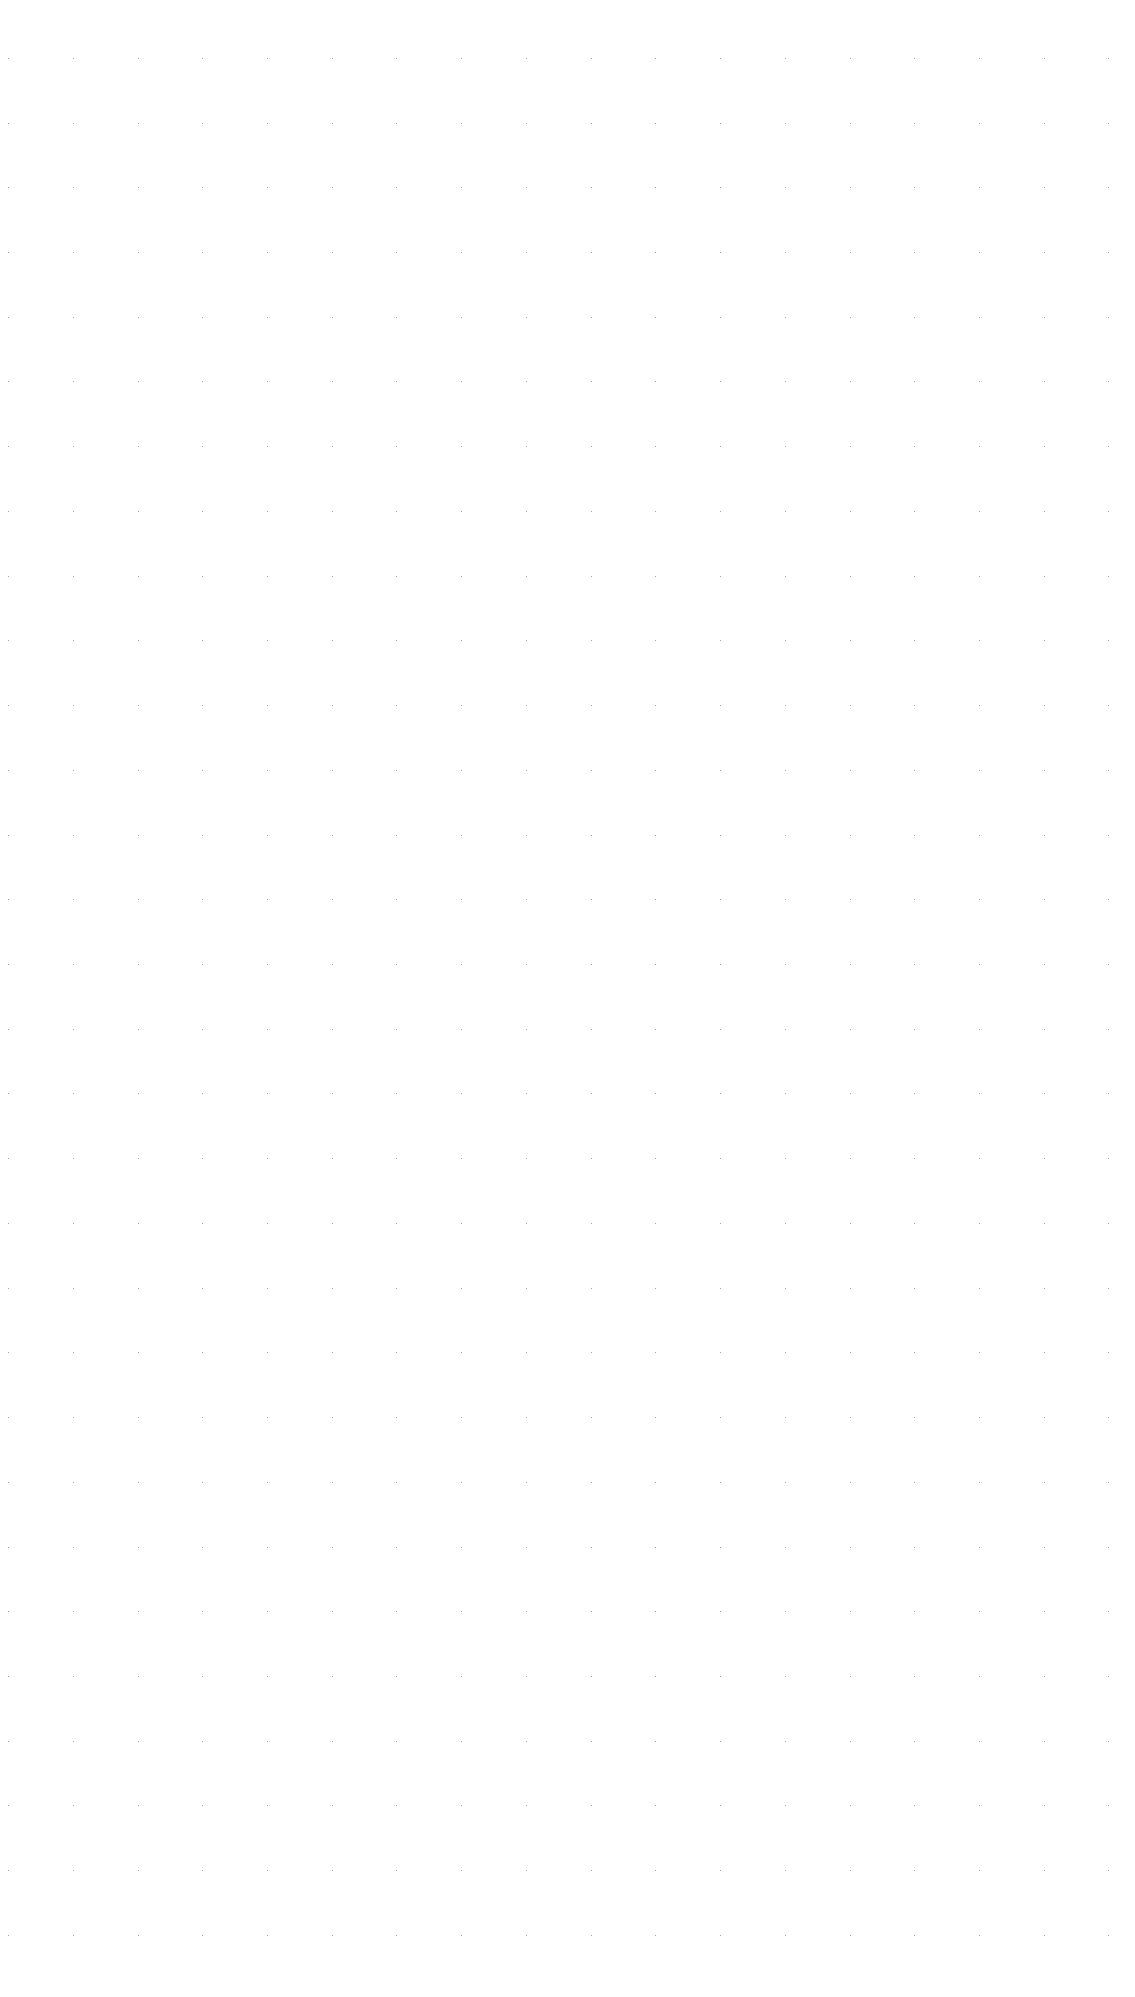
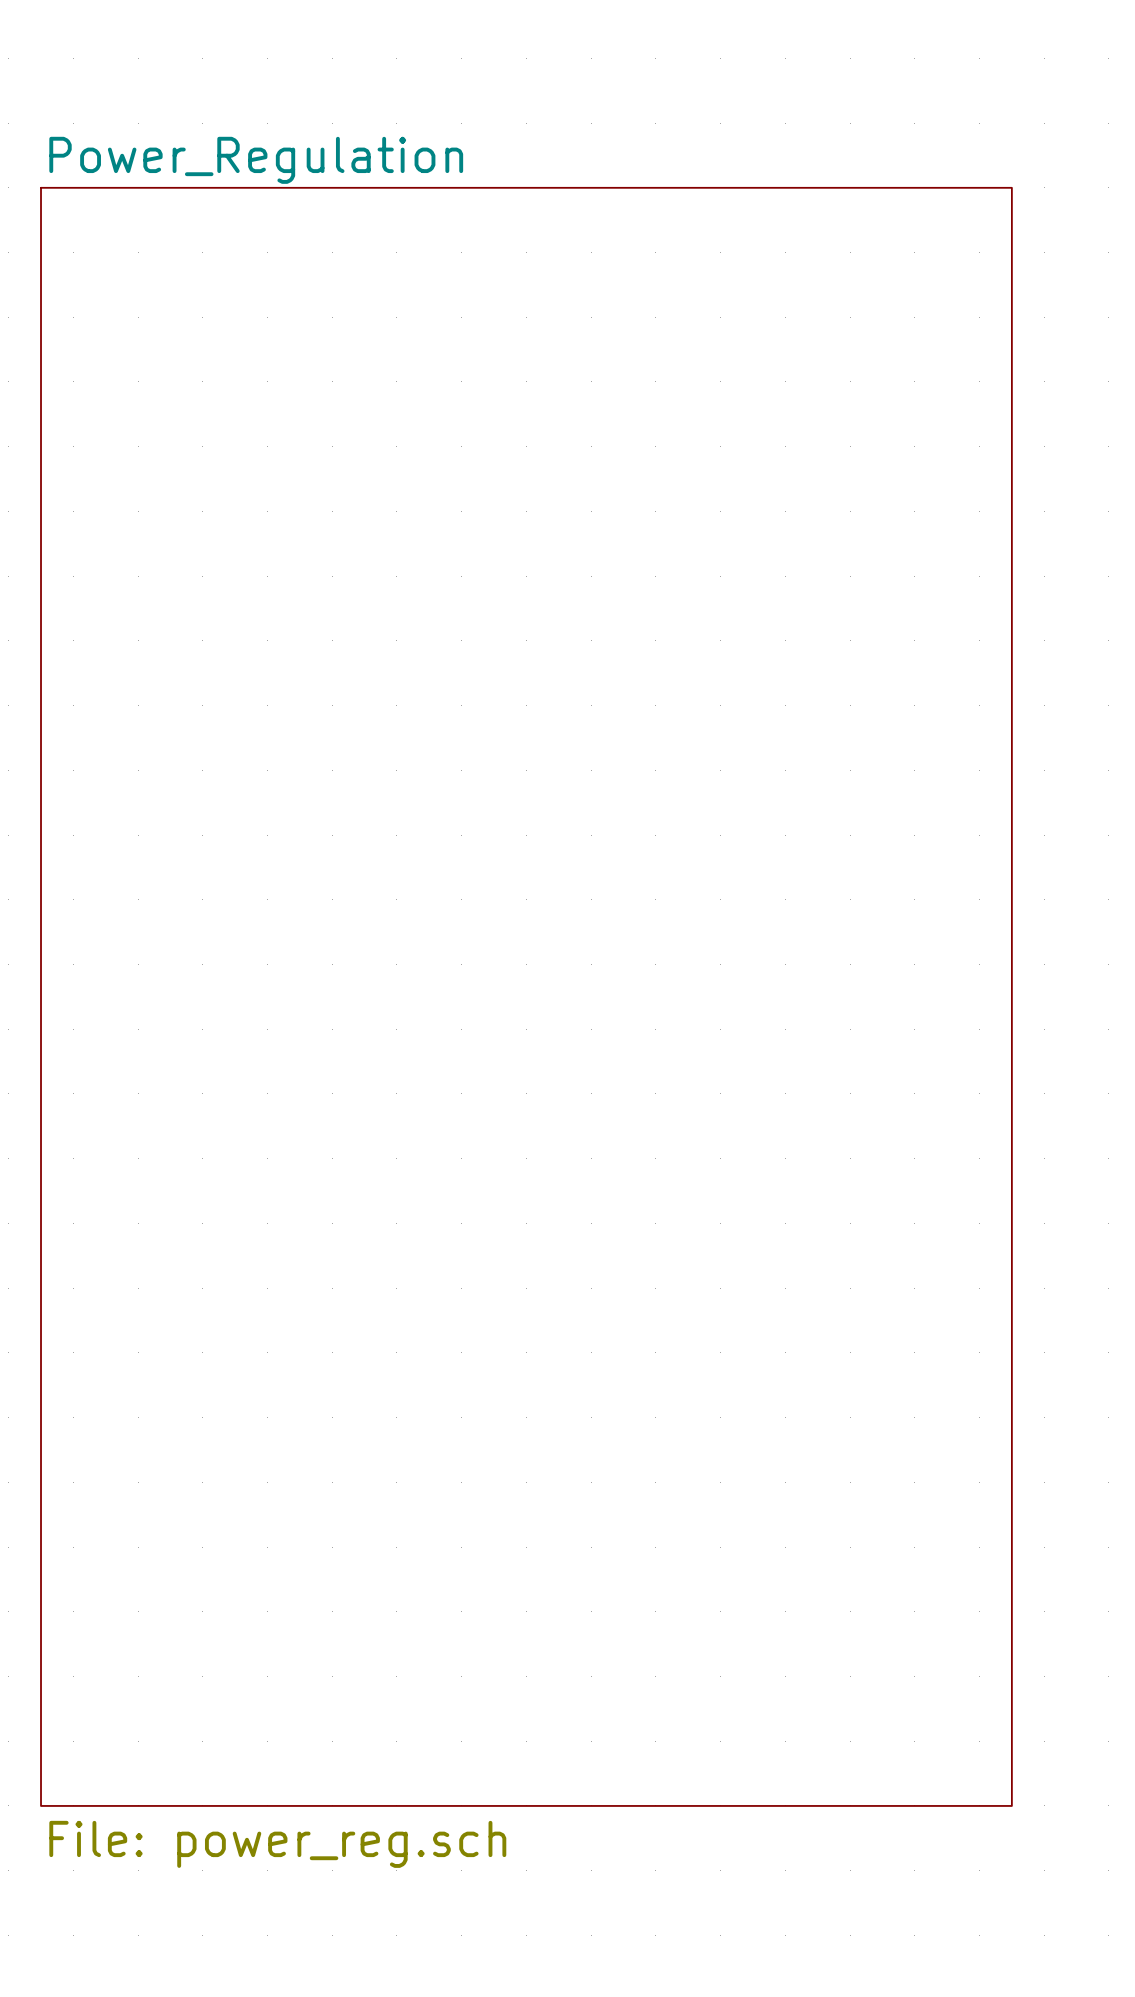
sheet Power_Regulation: none -> File: power_reg.sch (526, 996)

